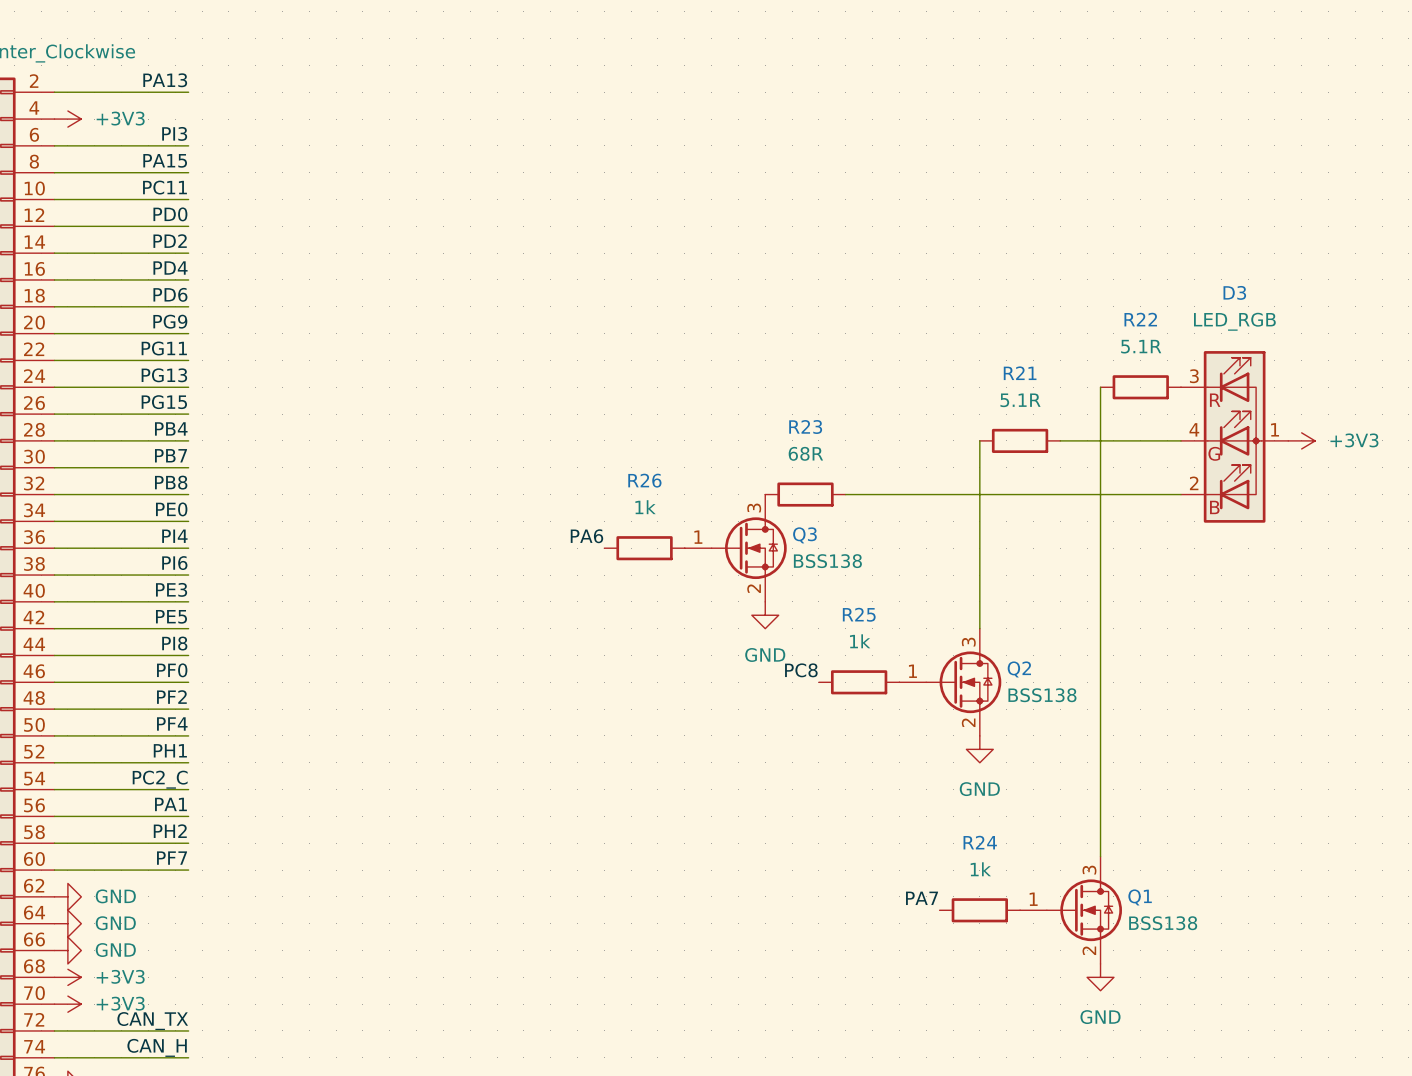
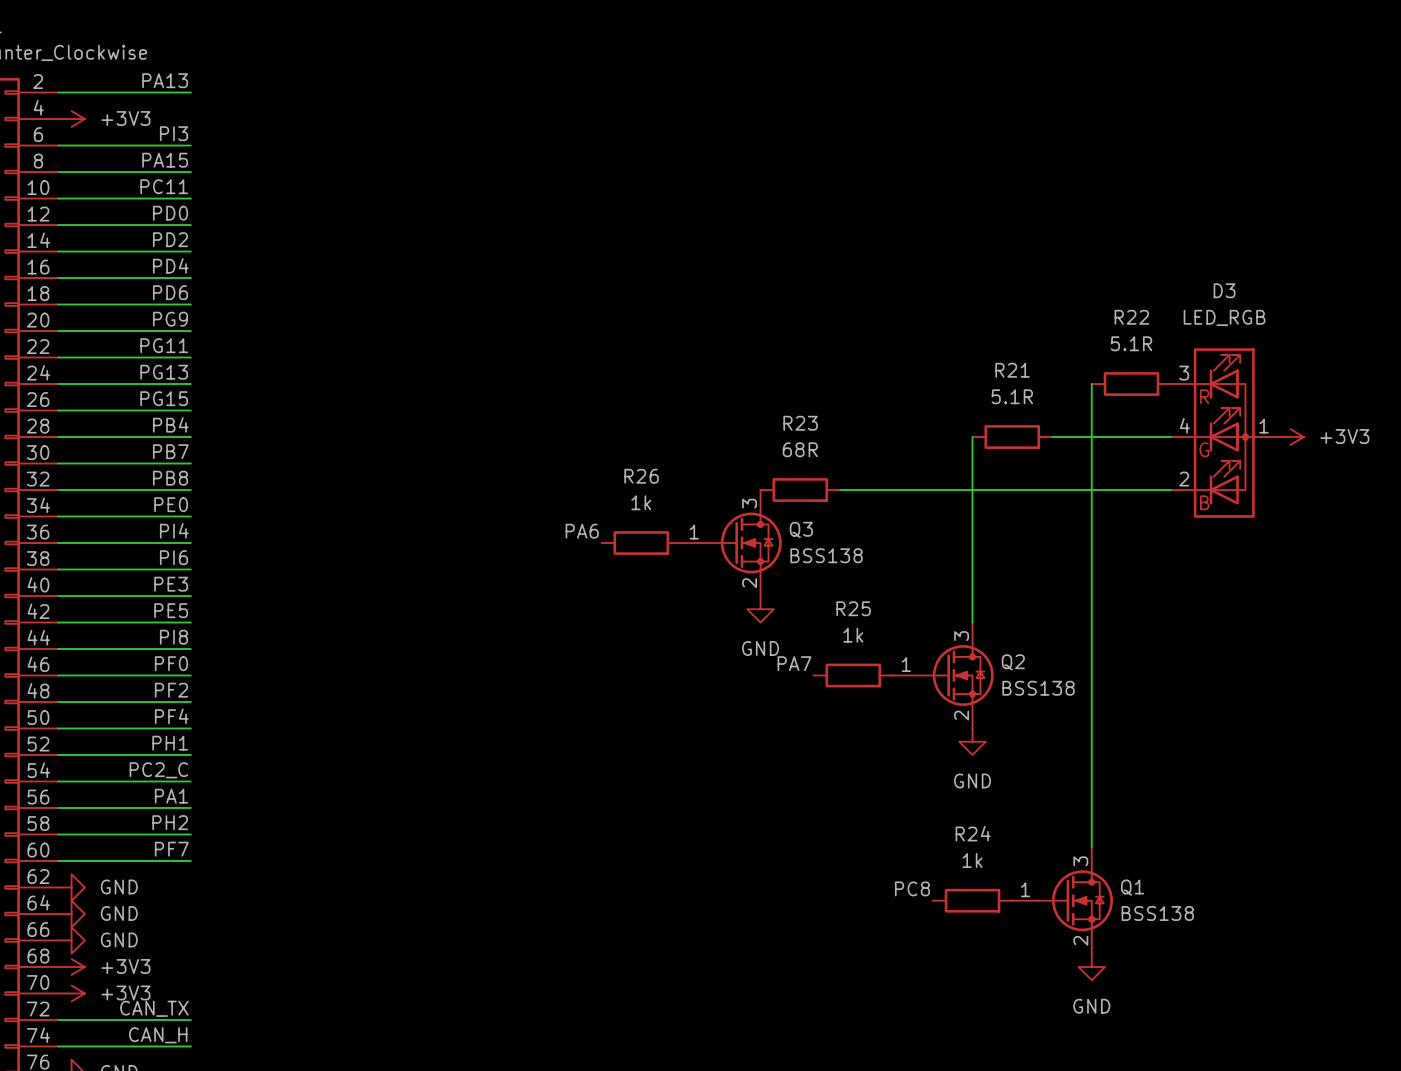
label: PC8 (801, 670) -> PA7 (794, 663)
label: PA7 (922, 898) -> PC8 (912, 888)

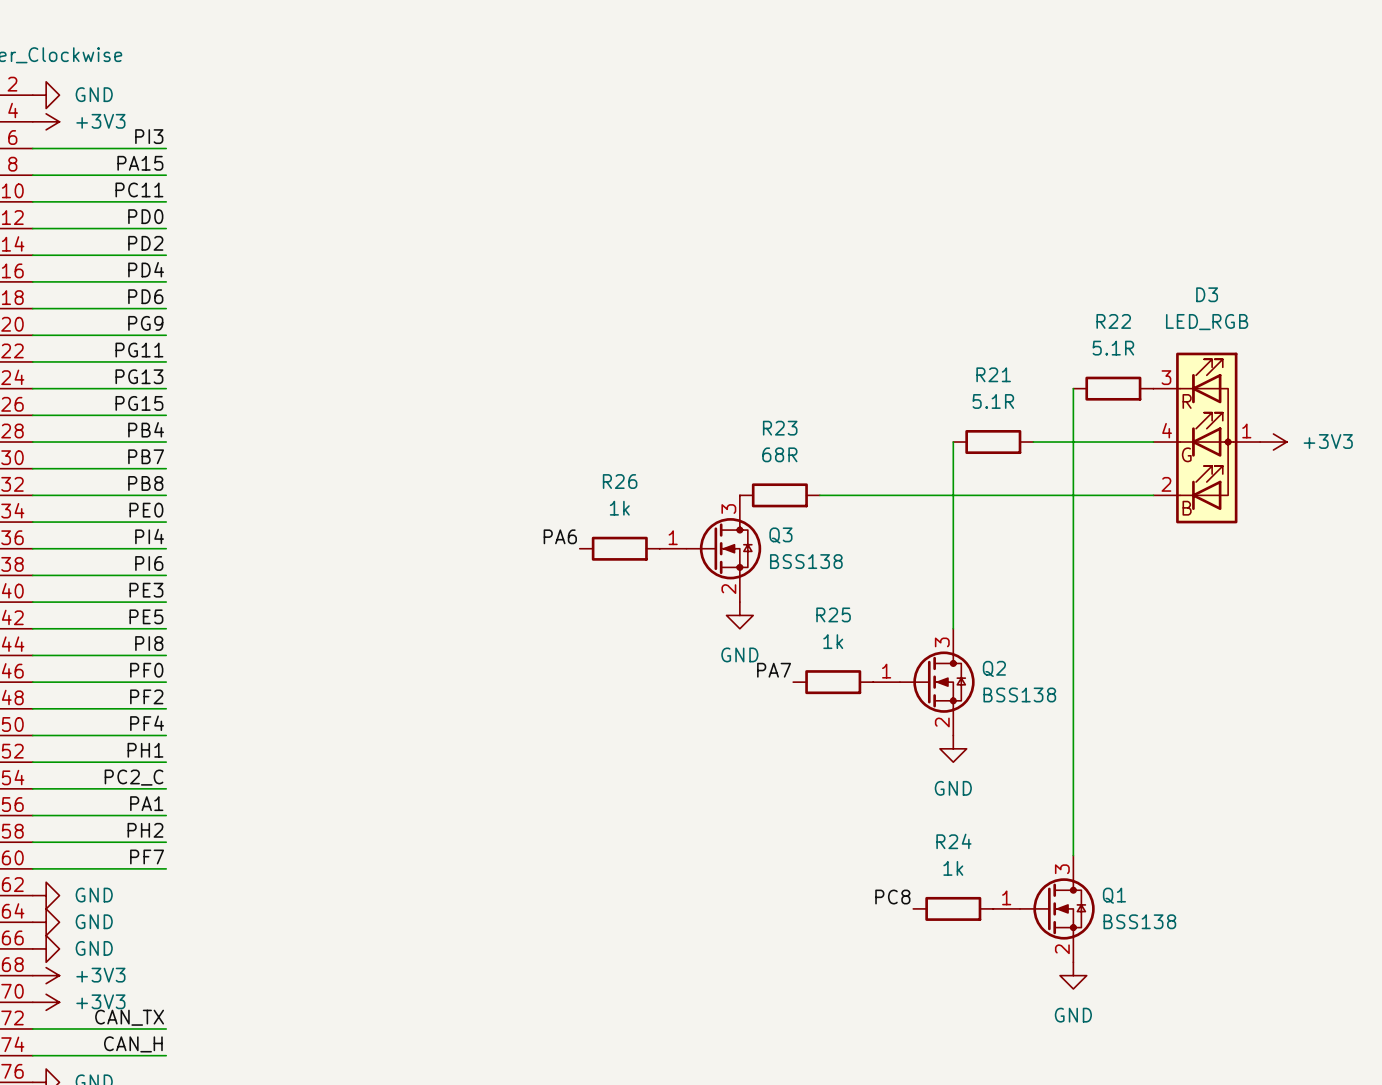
label: PA13 (165, 80) -> none
wire: (58, 92) (190, 92) -> none
power symbol: none -> GND (46, 95)

